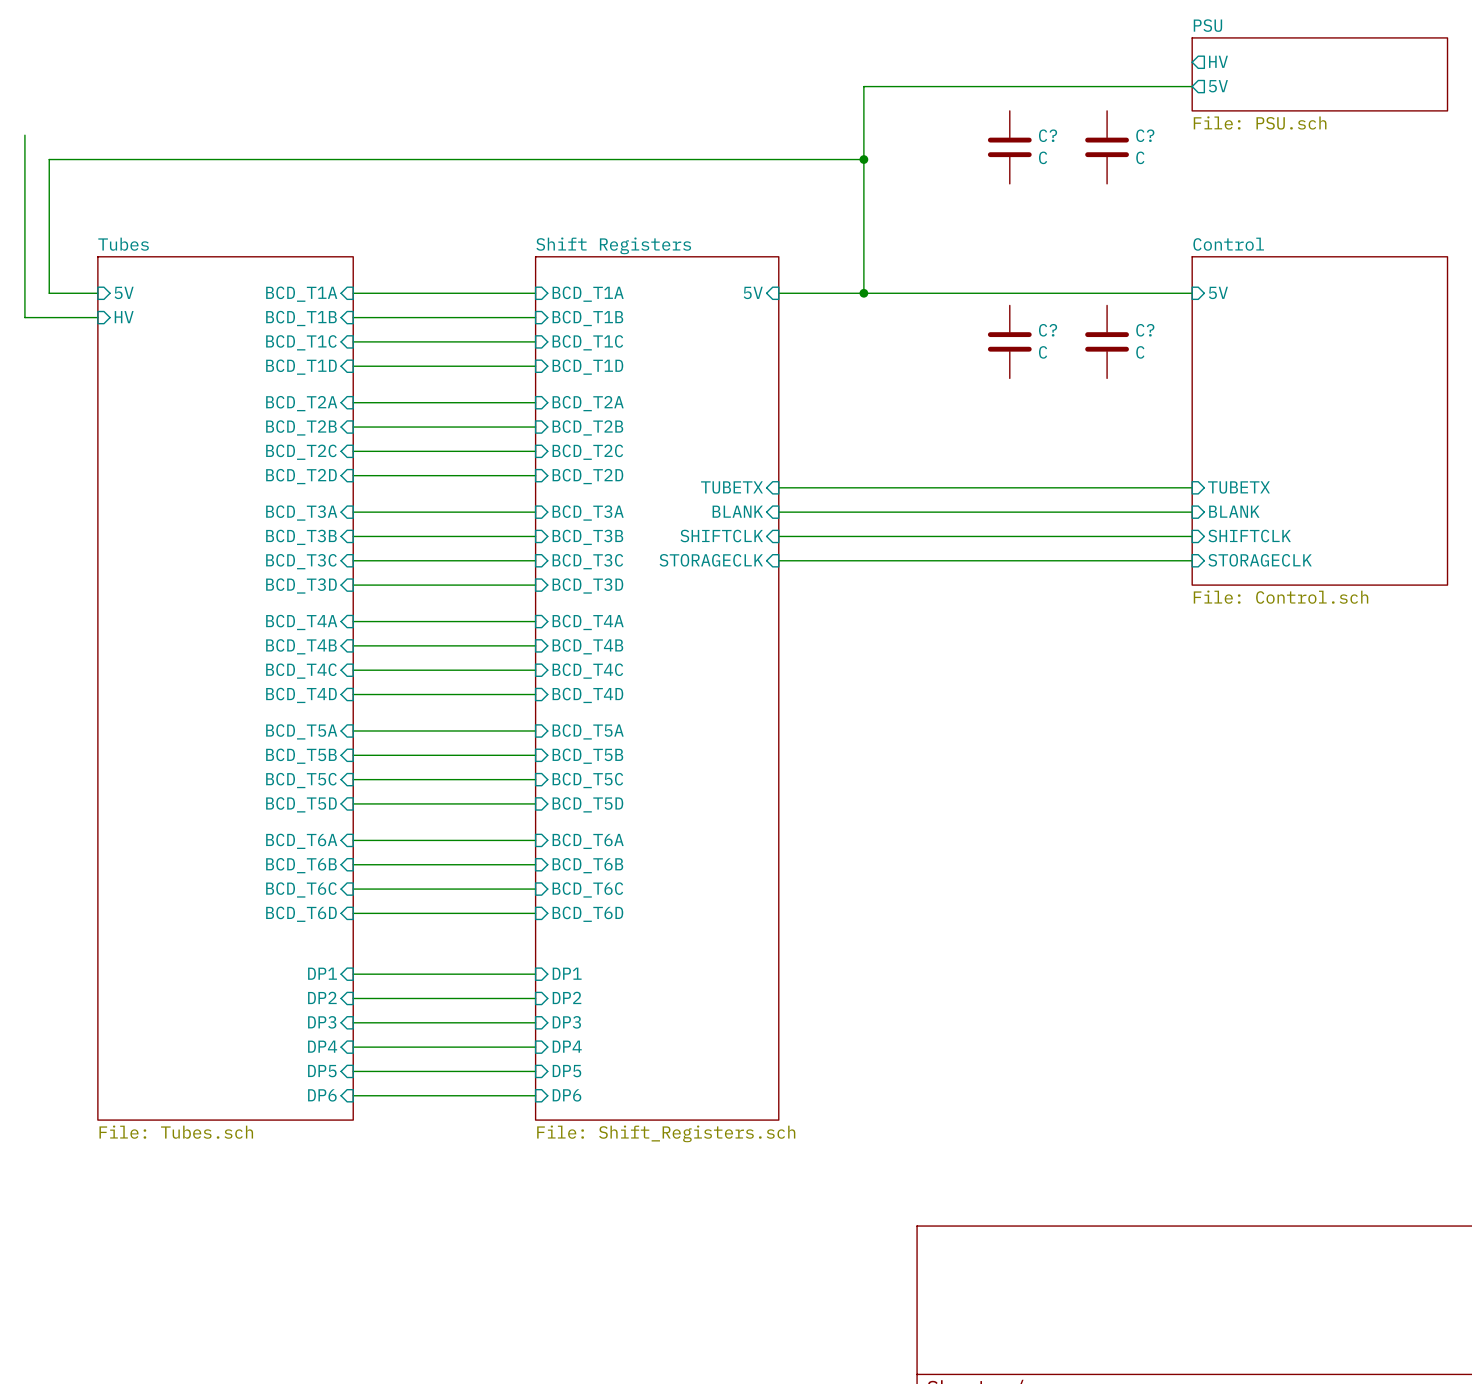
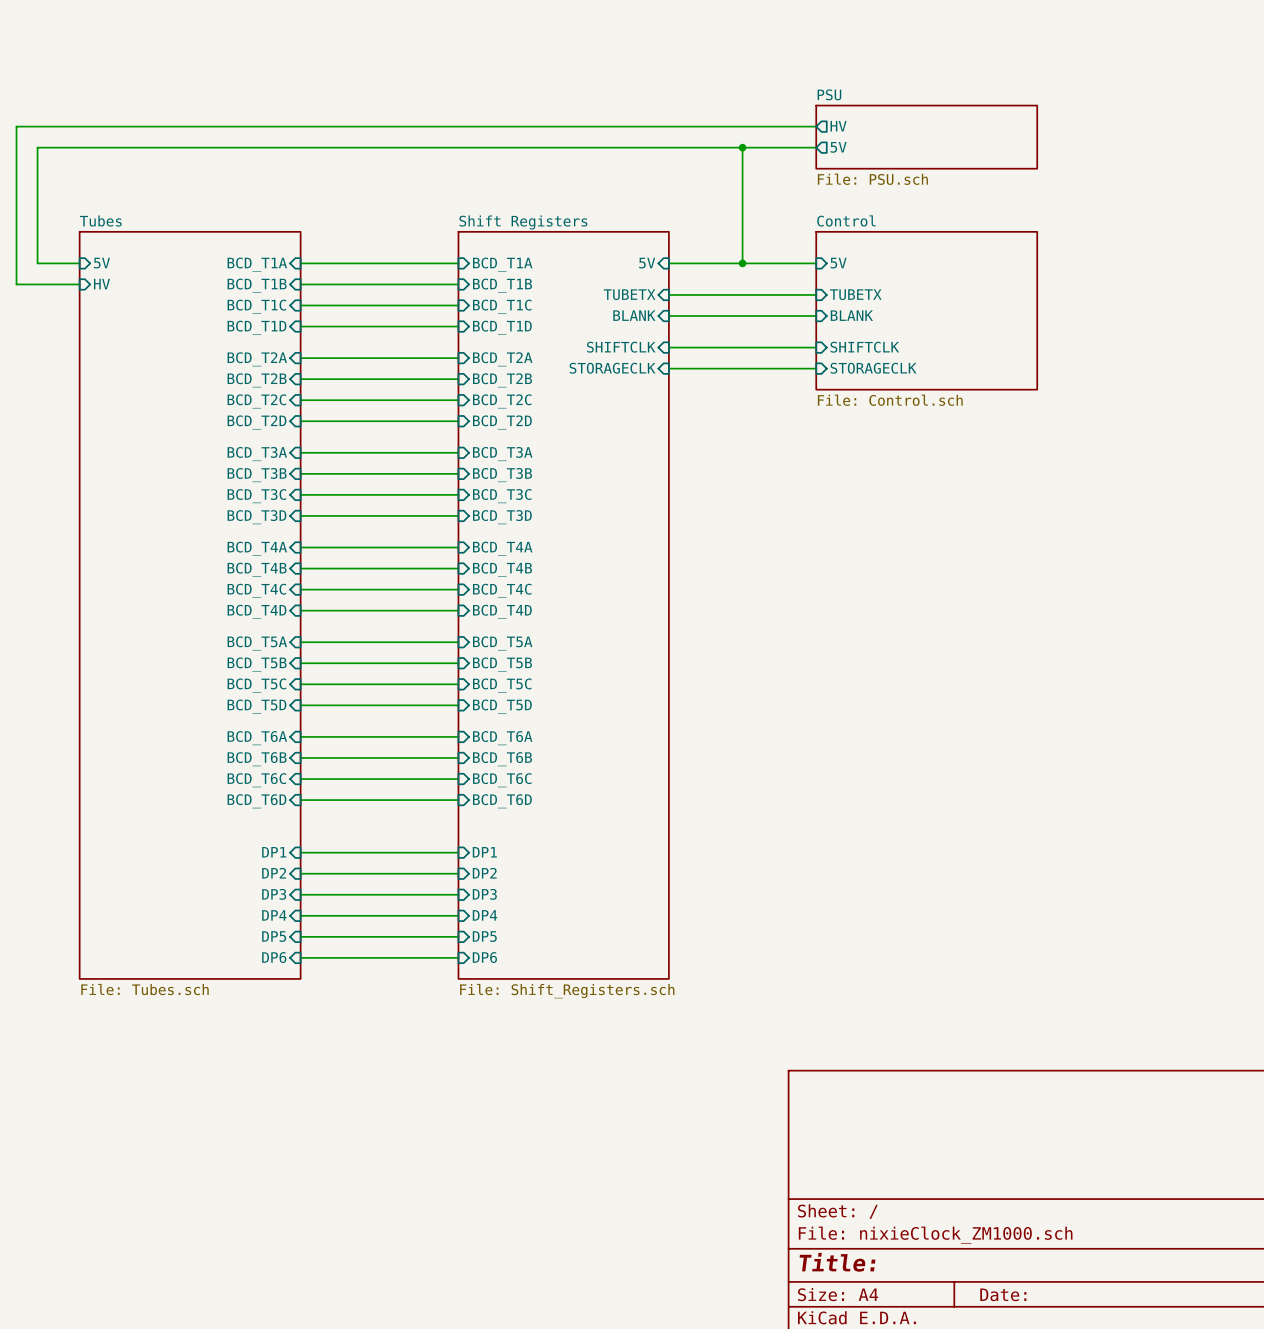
sheet pin: HV (1218, 61) -> none
sheet PSU: File: PSU.sch (1319, 74) -> none
wire: (1192, 86) (863, 86) (863, 159) -> (816, 147) (742, 147)
sheet pin: 5V (1218, 86) -> none
sheet pin: none -> HV (838, 126)
wire: none -> (16, 126) (816, 126)
C?: C (1009, 147) -> none
sheet PSU: none -> File: PSU.sch (926, 137)
C?: C (1107, 147) -> none
sheet pin: none -> 5V (838, 147)
sheet pin: none -> 5V (838, 263)
sheet pin: 5V (1218, 292) -> none
wire: (949, 293) (1192, 293) -> none
sheet pin: none -> TUBETX (629, 294)
wire: none -> (668, 294) (816, 294)
sheet pin: none -> TUBETX (855, 294)
C?: C (1009, 341) -> none
C?: C (1107, 341) -> none
sheet Control: none -> File: Control.sch (926, 310)
sheet pin: none -> BLANK (634, 315)
sheet pin: none -> BLANK (851, 315)
wire: none -> (668, 316) (816, 316)
sheet pin: none -> SHIFTCLK (621, 347)
wire: none -> (668, 347) (816, 347)
sheet pin: none -> SHIFTCLK (864, 347)
sheet pin: none -> STORAGECLK (612, 368)
wire: none -> (668, 368) (816, 368)
sheet pin: none -> STORAGECLK (873, 368)
sheet Control: File: Control.sch (1319, 420) -> none
sheet pin: TUBETX (731, 487) -> none
wire: (778, 487) (1192, 487) -> none
sheet pin: TUBETX (1238, 487) -> none
sheet pin: BLANK (737, 511) -> none
sheet pin: BLANK (1234, 511) -> none
wire: (778, 512) (1192, 512) -> none
sheet pin: SHIFTCLK (721, 536) -> none
wire: (778, 536) (1192, 536) -> none
sheet pin: SHIFTCLK (1249, 536) -> none
sheet pin: STORAGECLK (711, 560) -> none
wire: (778, 560) (1192, 560) -> none
sheet pin: STORAGECLK (1260, 560) -> none

